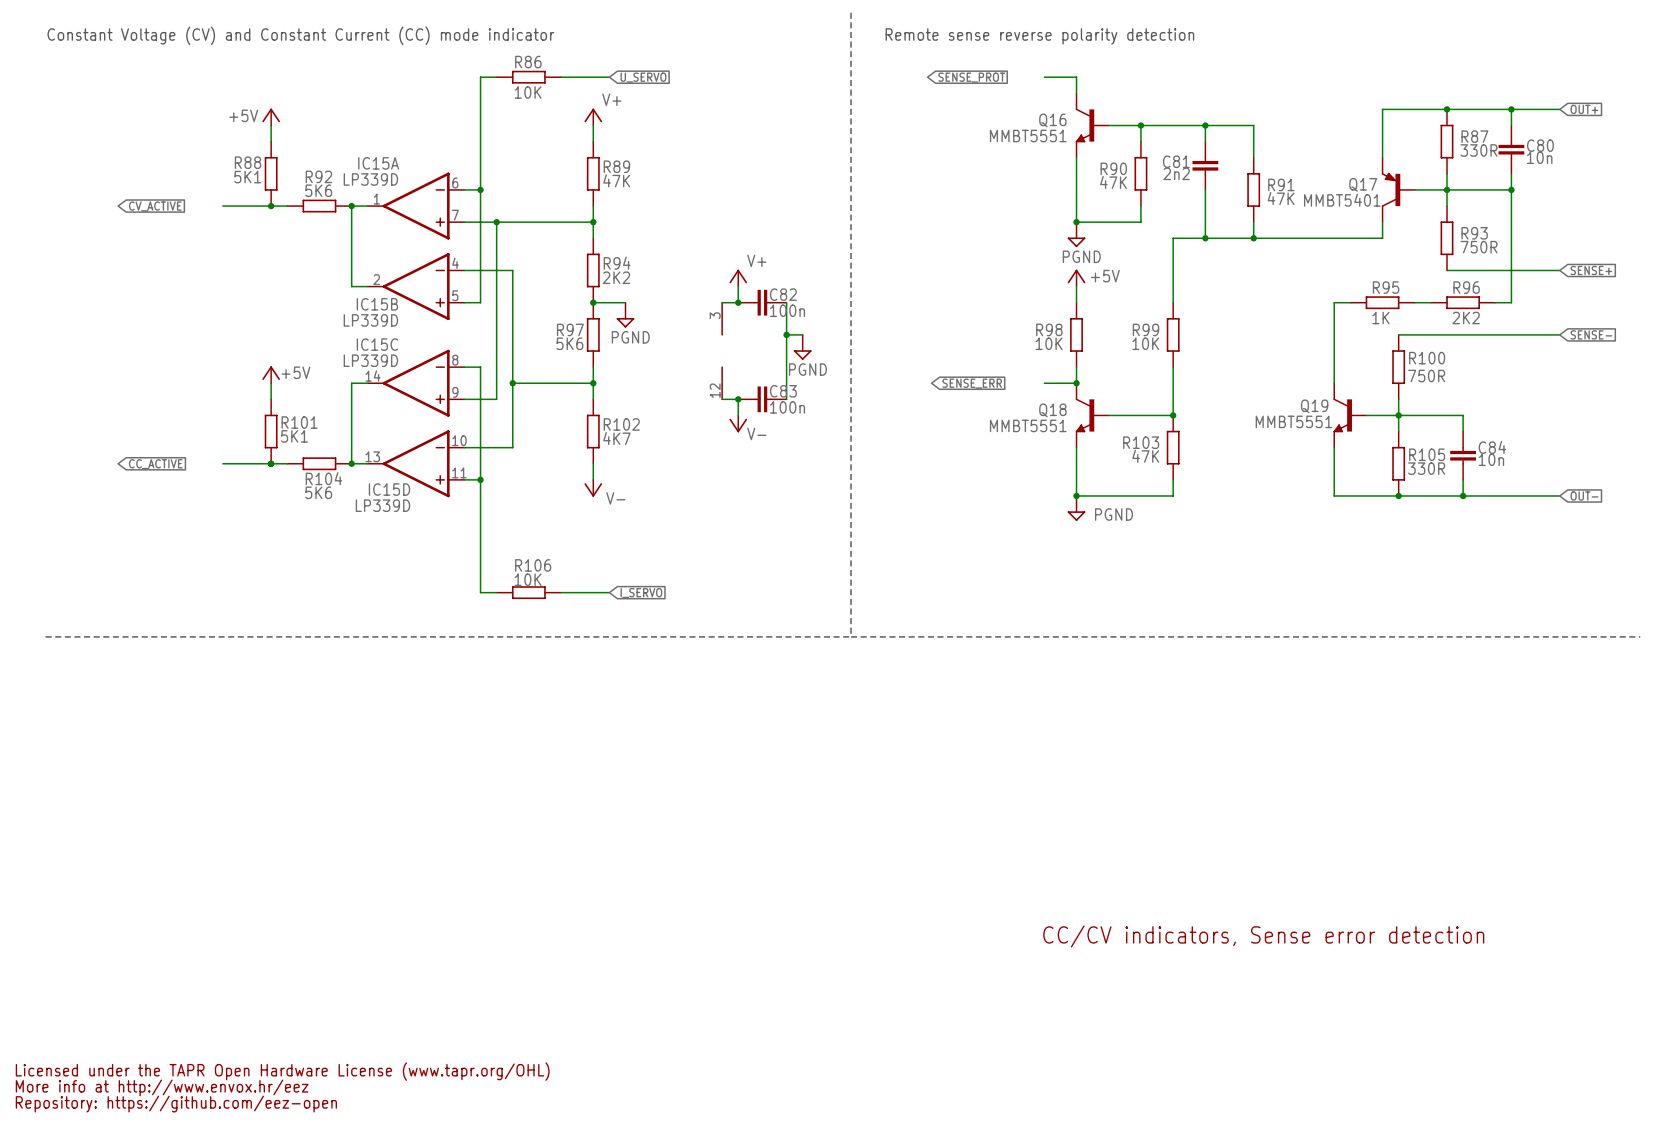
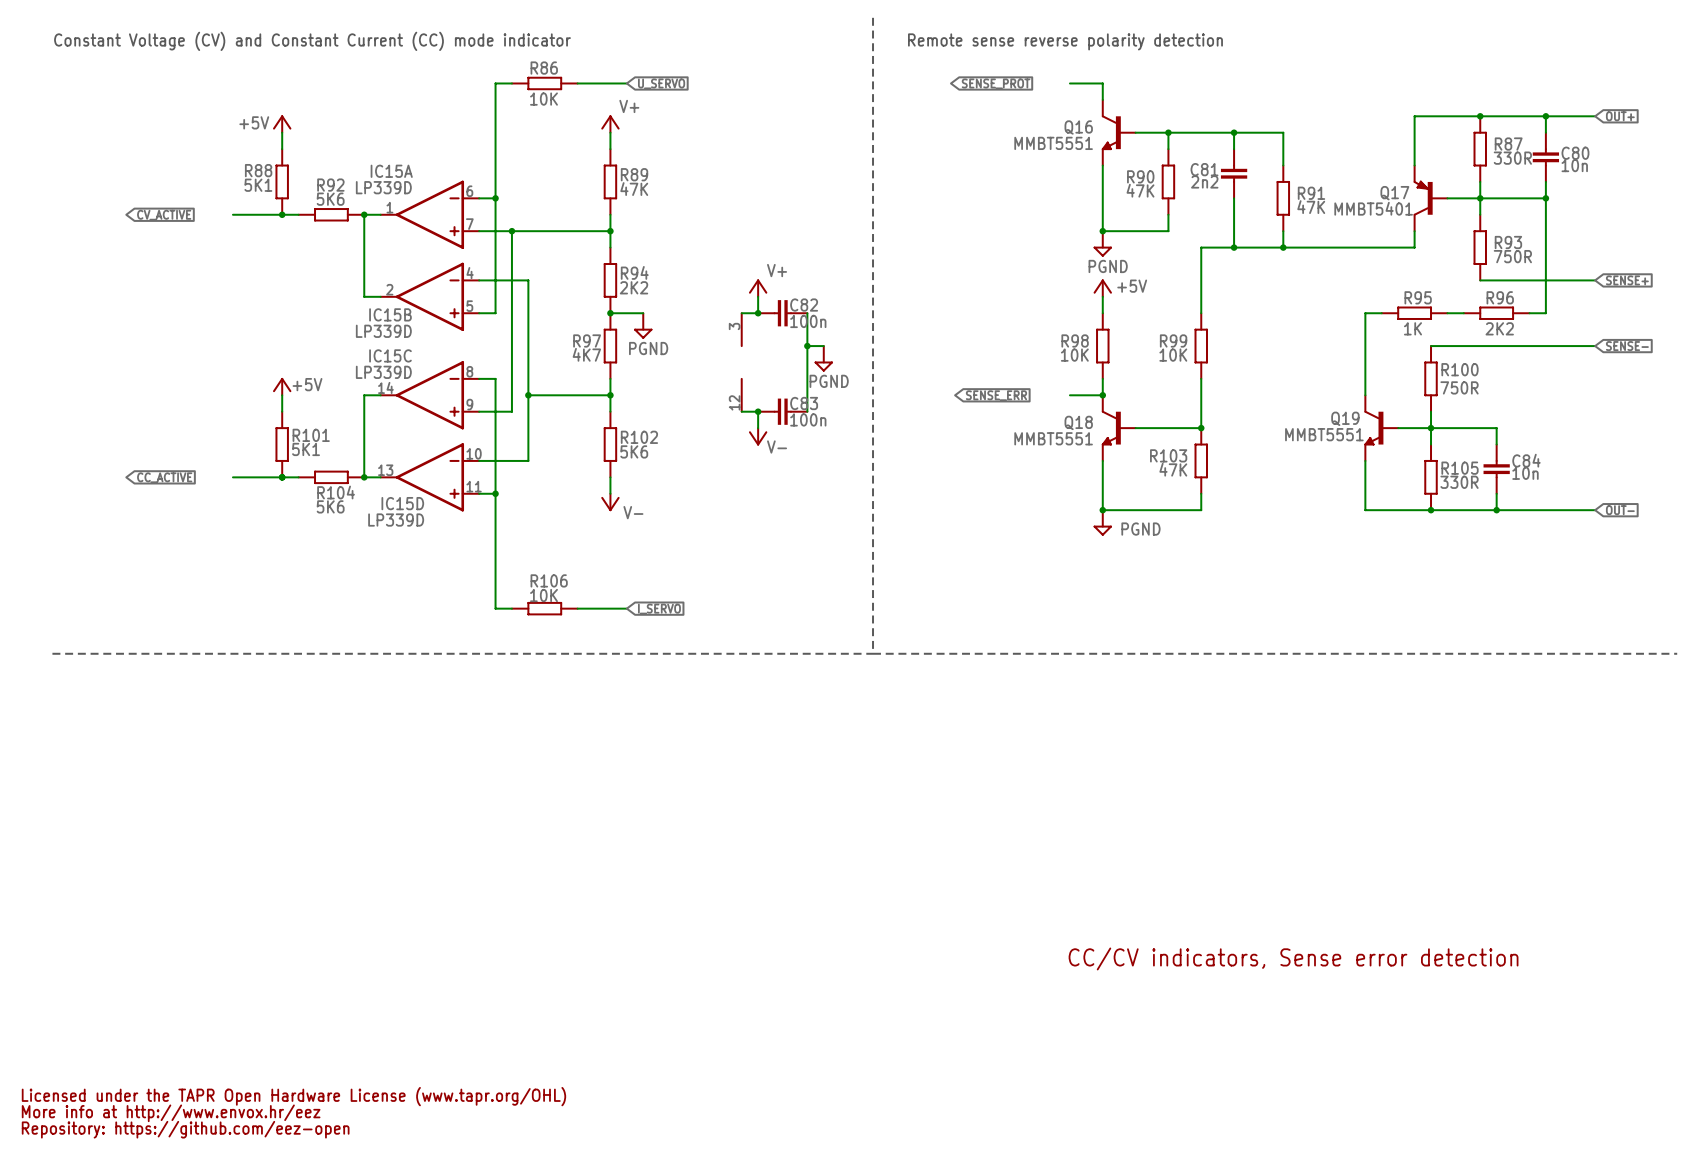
R97 value: 5K6 (569, 343) -> 4K7 (586, 354)
R102 value: 4K7 (616, 438) -> 5K6 (634, 451)

